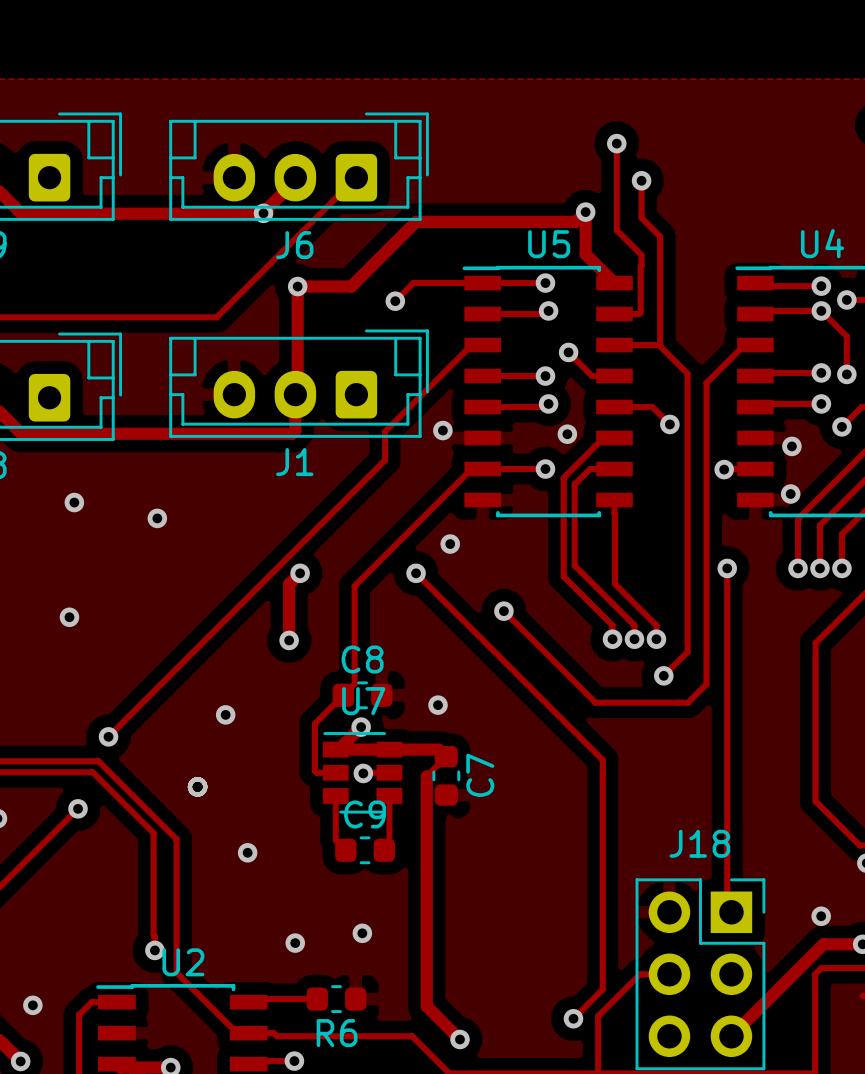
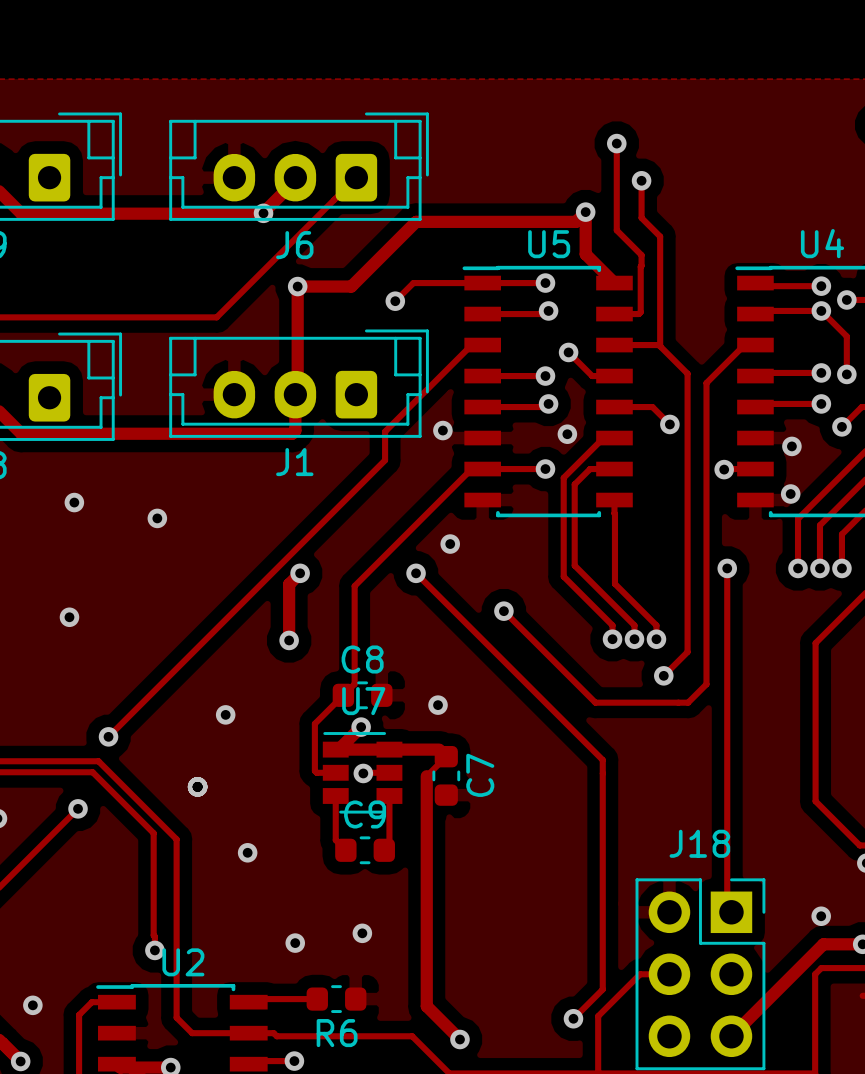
track: (176, 972) (237, 1033) -> (176, 972) (176, 1017) (192, 1033) (237, 1033)

